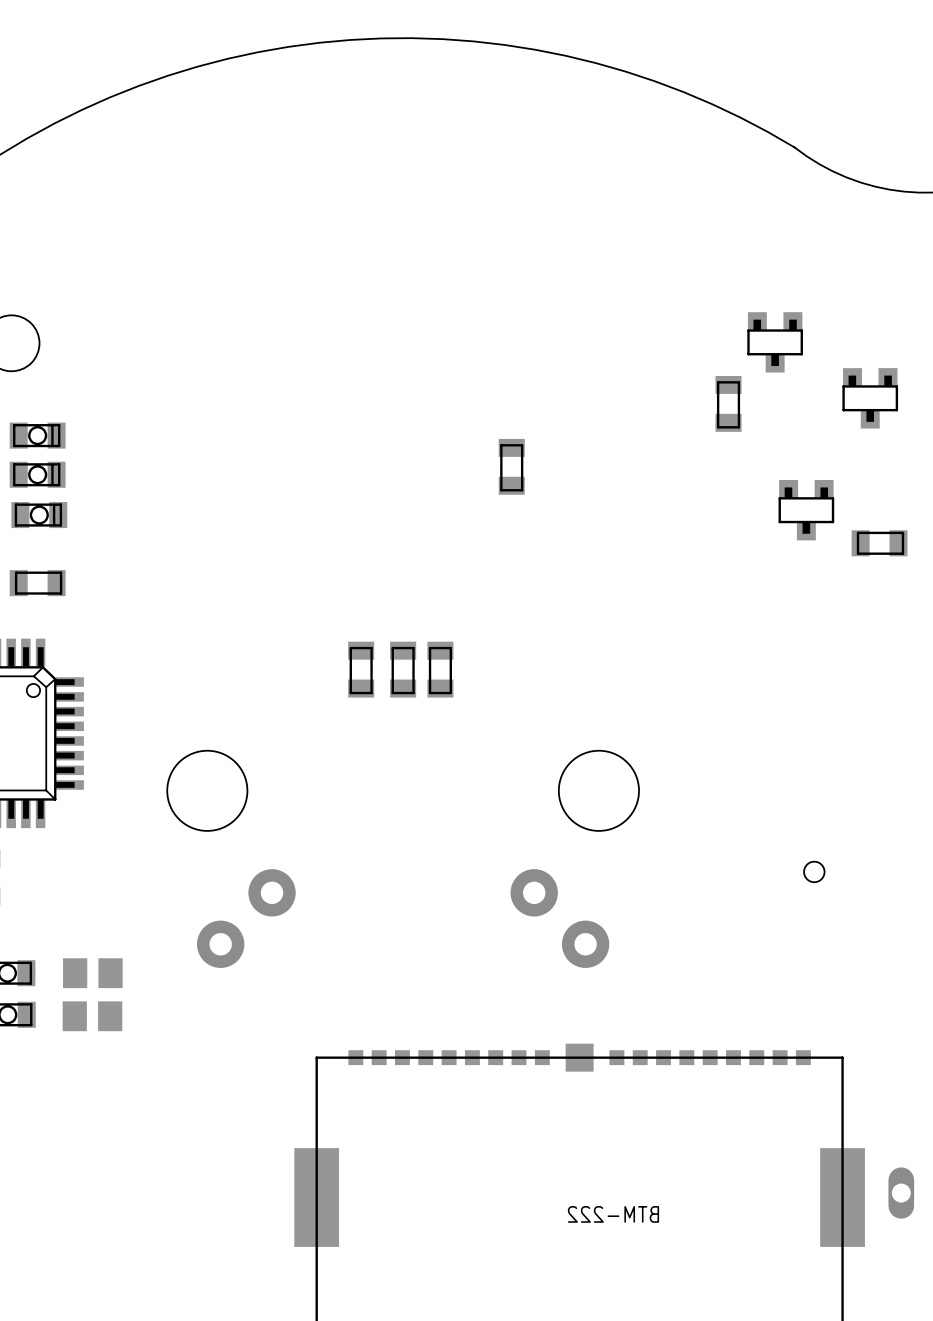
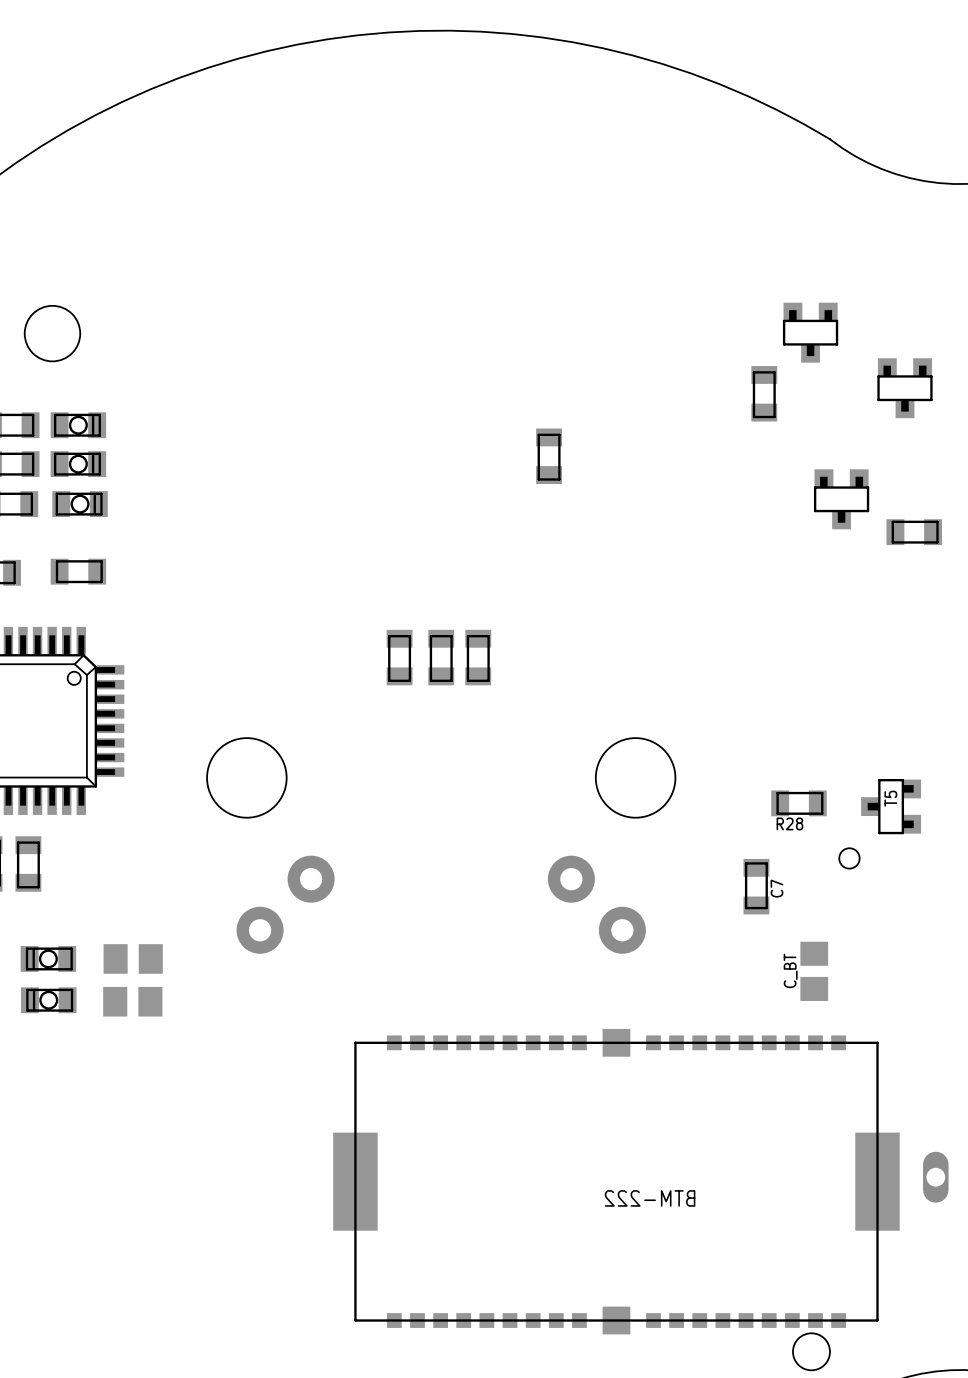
R28: none -> (798, 803)
T5: none -> (891, 806)
C7: none -> (756, 886)
C_BT: none -> (814, 971)

